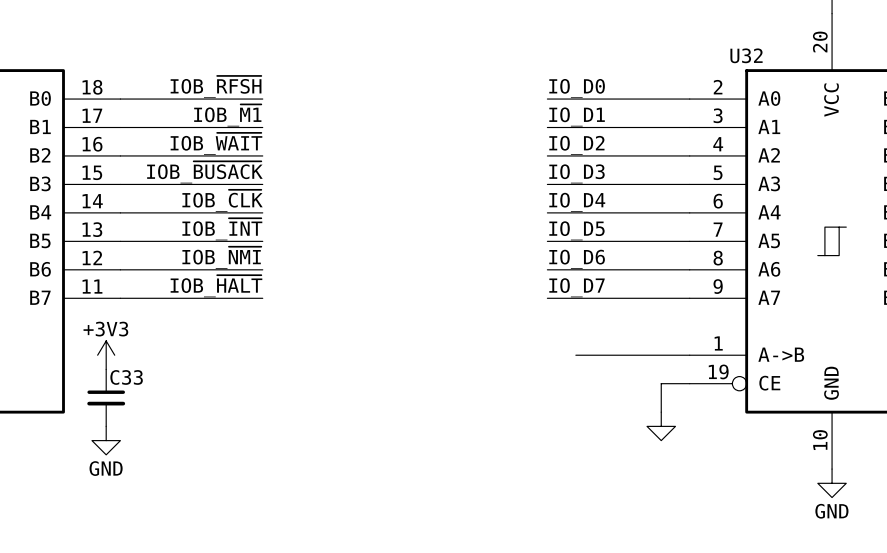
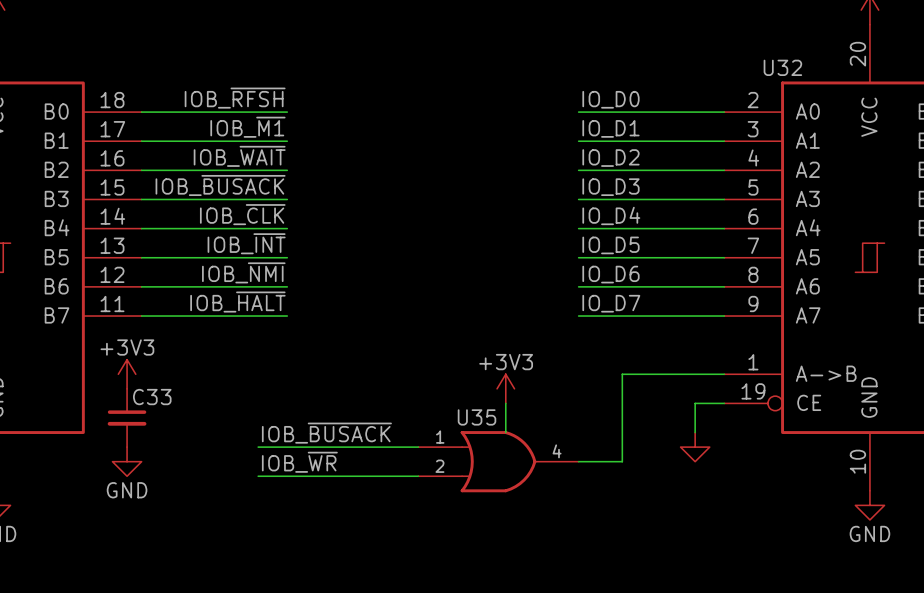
wire: (575, 355) (590, 355) -> (578, 461) (622, 461) (622, 374)
power symbol: none -> +3V3 (505, 388)
wire: none -> (505, 403) (505, 432)
label: none -> IOB_~{BUSACK} (326, 433)
wire: none -> (258, 447) (418, 447)
U35: none -> (498, 461)
label: none -> IOB_~{WR} (299, 462)
wire: none -> (258, 476) (418, 476)

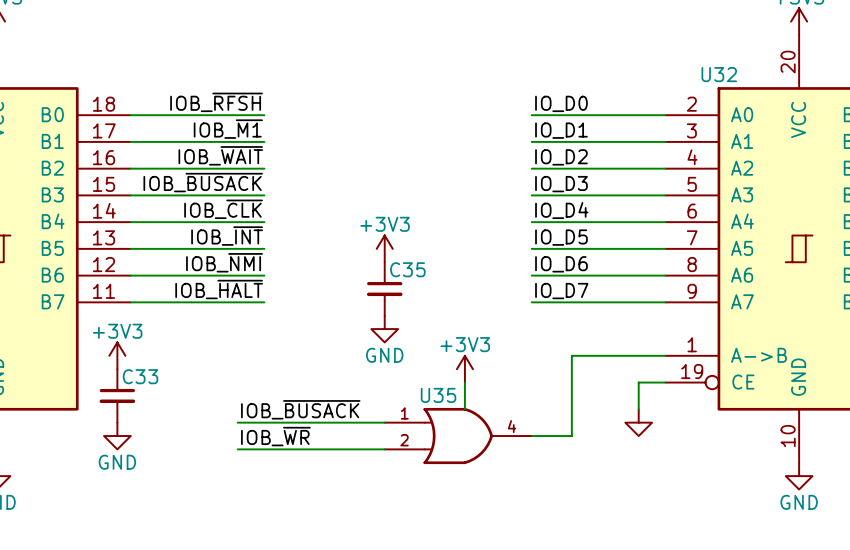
power symbol: none -> +3V3 (384, 248)
C35: none -> (384, 288)
power symbol: none -> GND (384, 329)

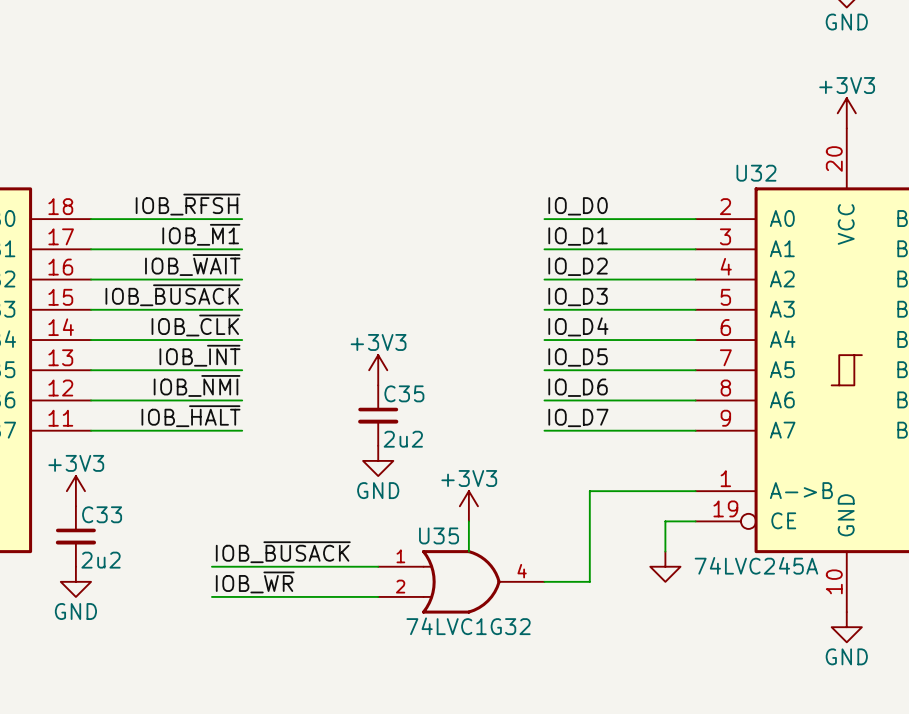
C35 value: none -> 2u2 (403, 439)
C33 value: none -> 2u2 (101, 560)
U32 value: none -> 74LVC245A (756, 565)
U35 value: none -> 74LVC1G32 (468, 626)

